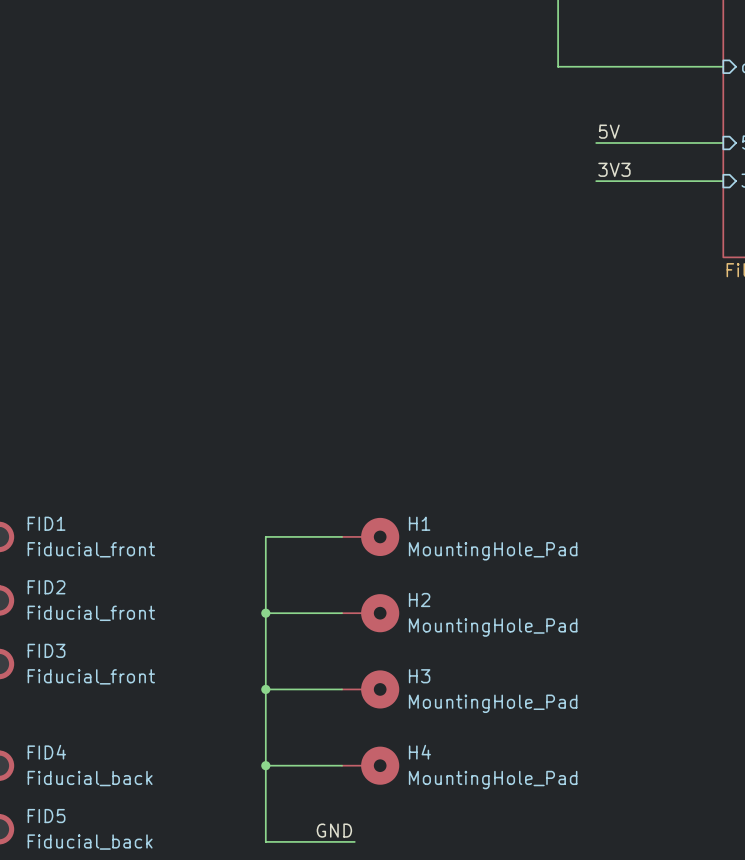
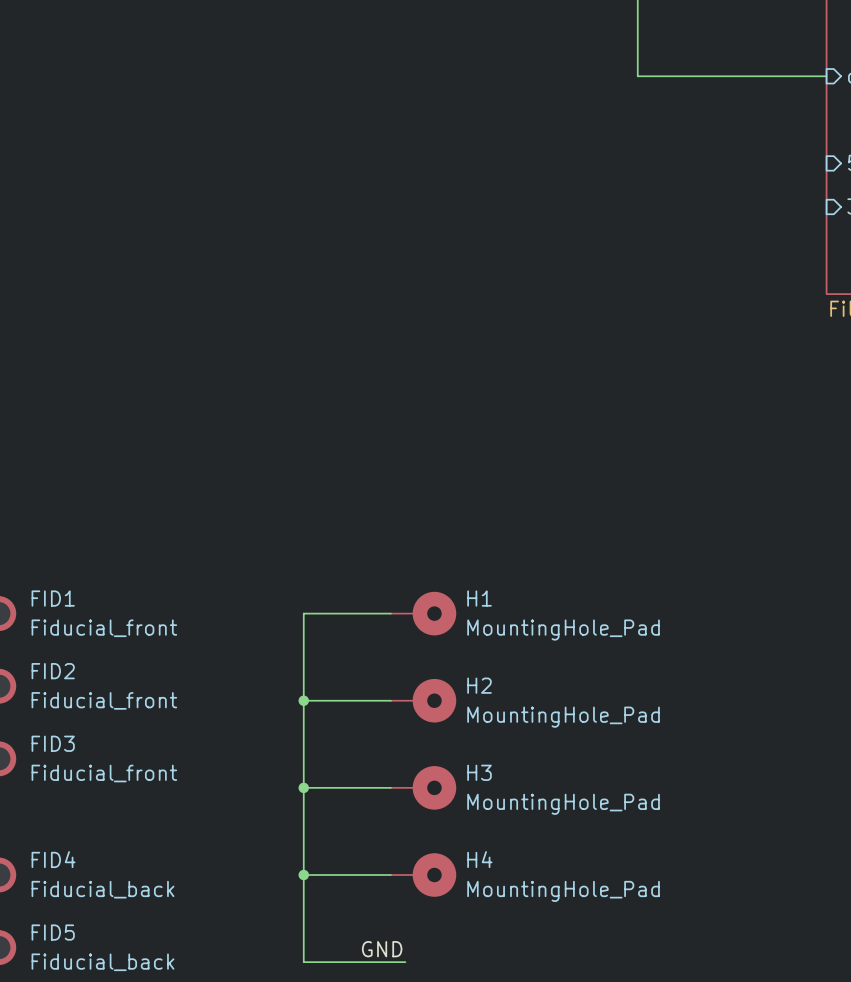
label: 5V (609, 131) -> none
wire: (596, 143) (723, 143) -> none
label: 3V3 (614, 169) -> none
wire: (596, 181) (723, 181) -> none

